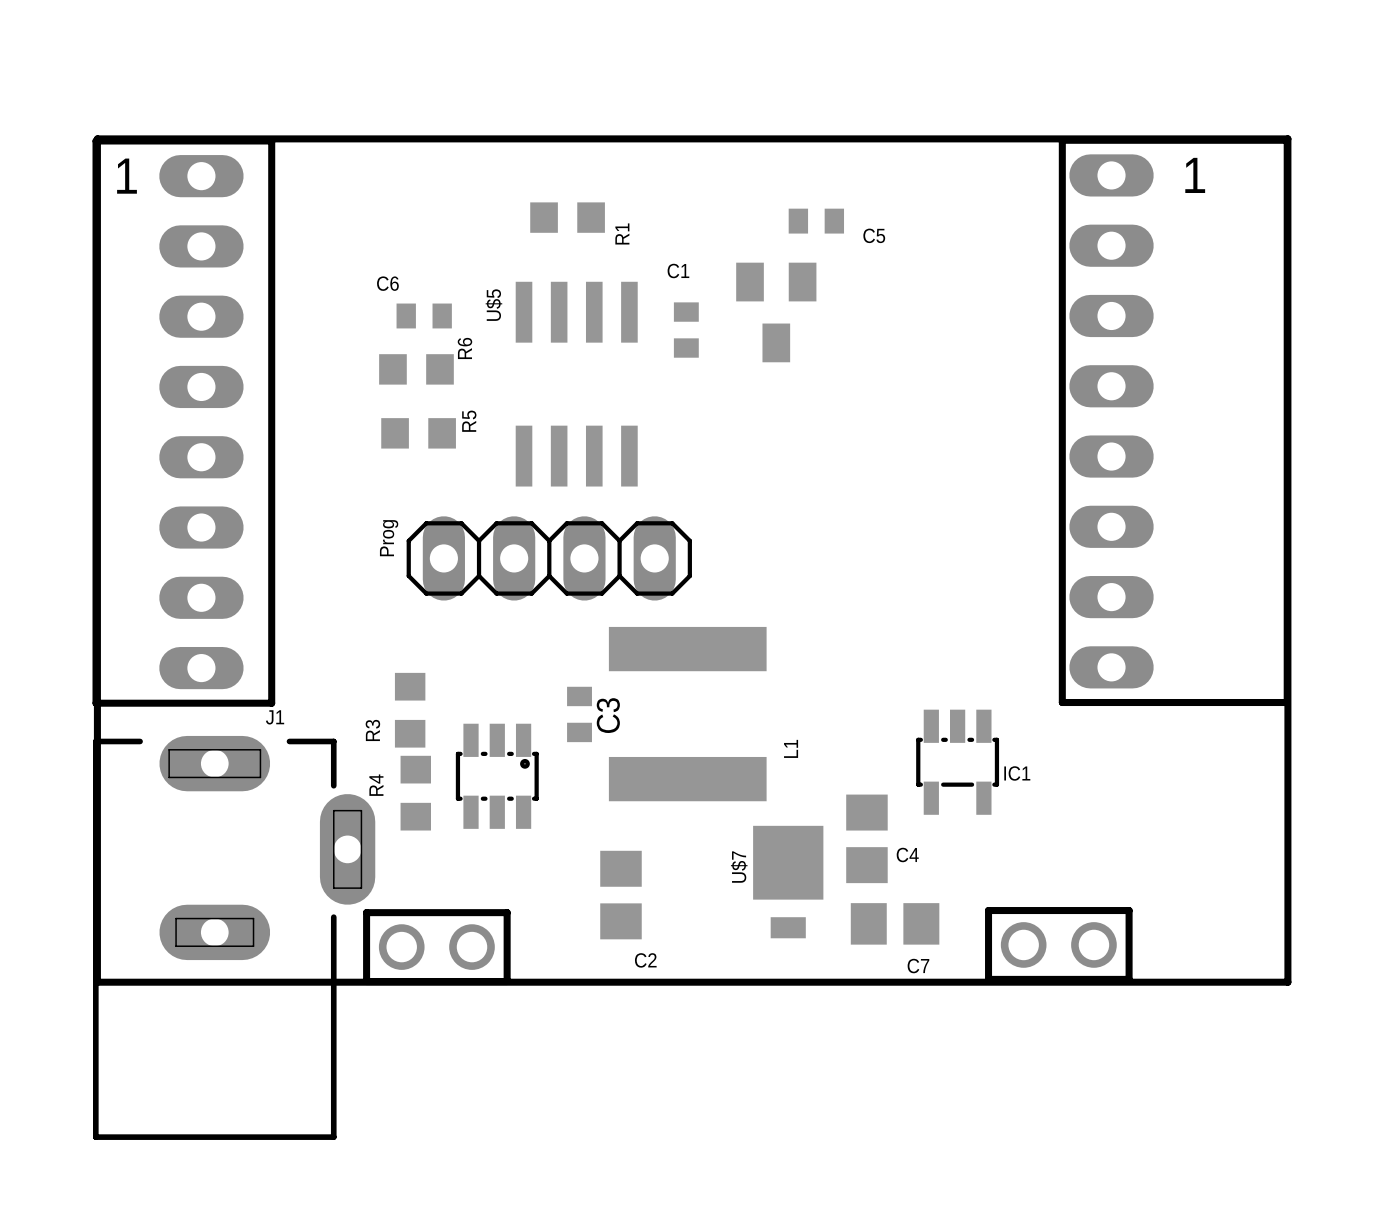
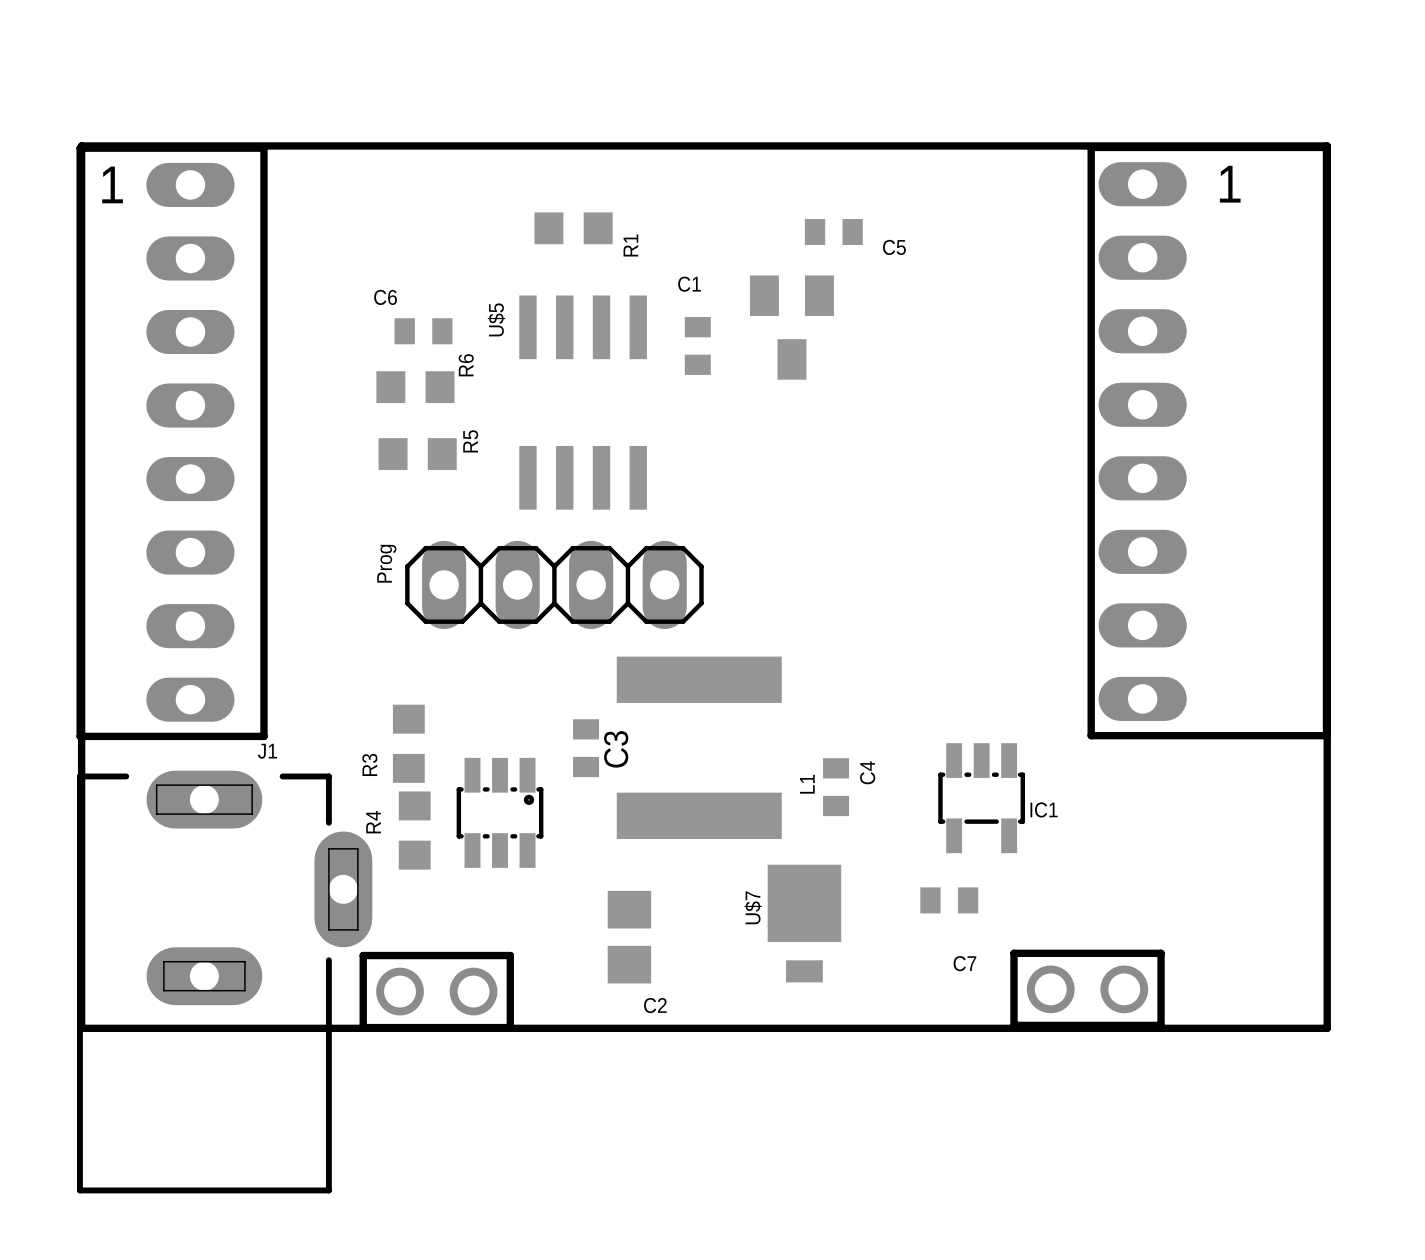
C4 footprint: [846, 794, 888, 884] -> [823, 758, 850, 817]
C7 footprint: [850, 903, 940, 945] -> [920, 887, 979, 914]

